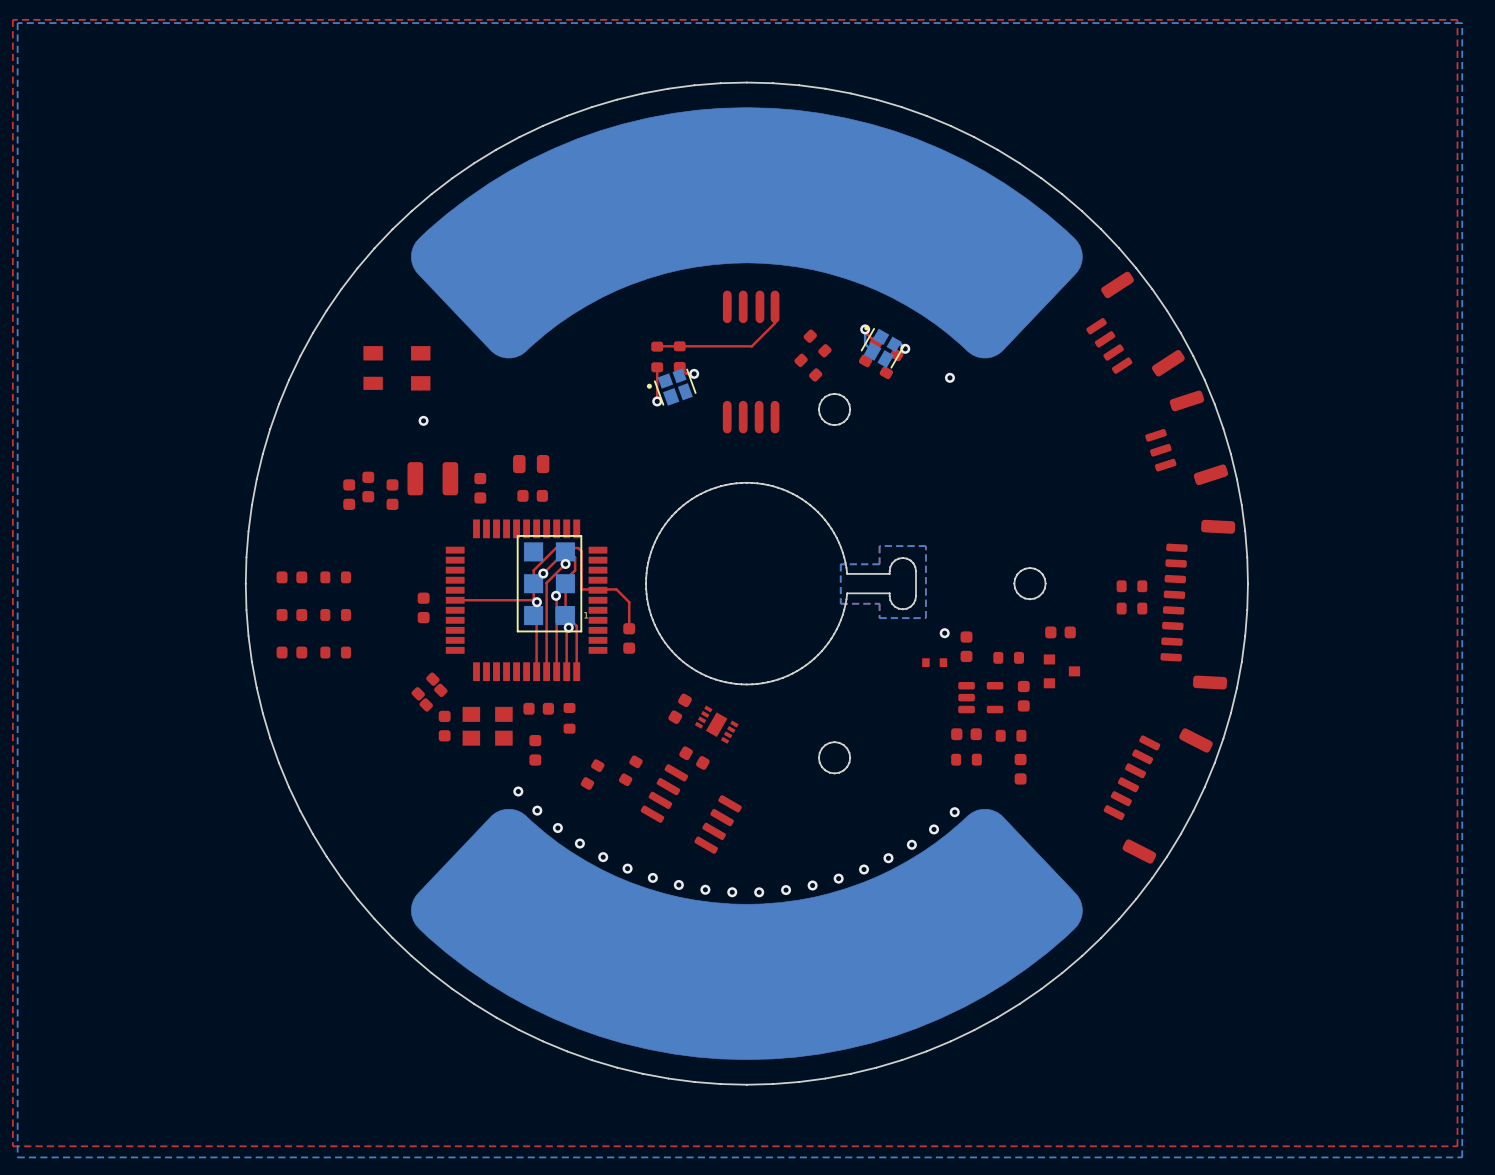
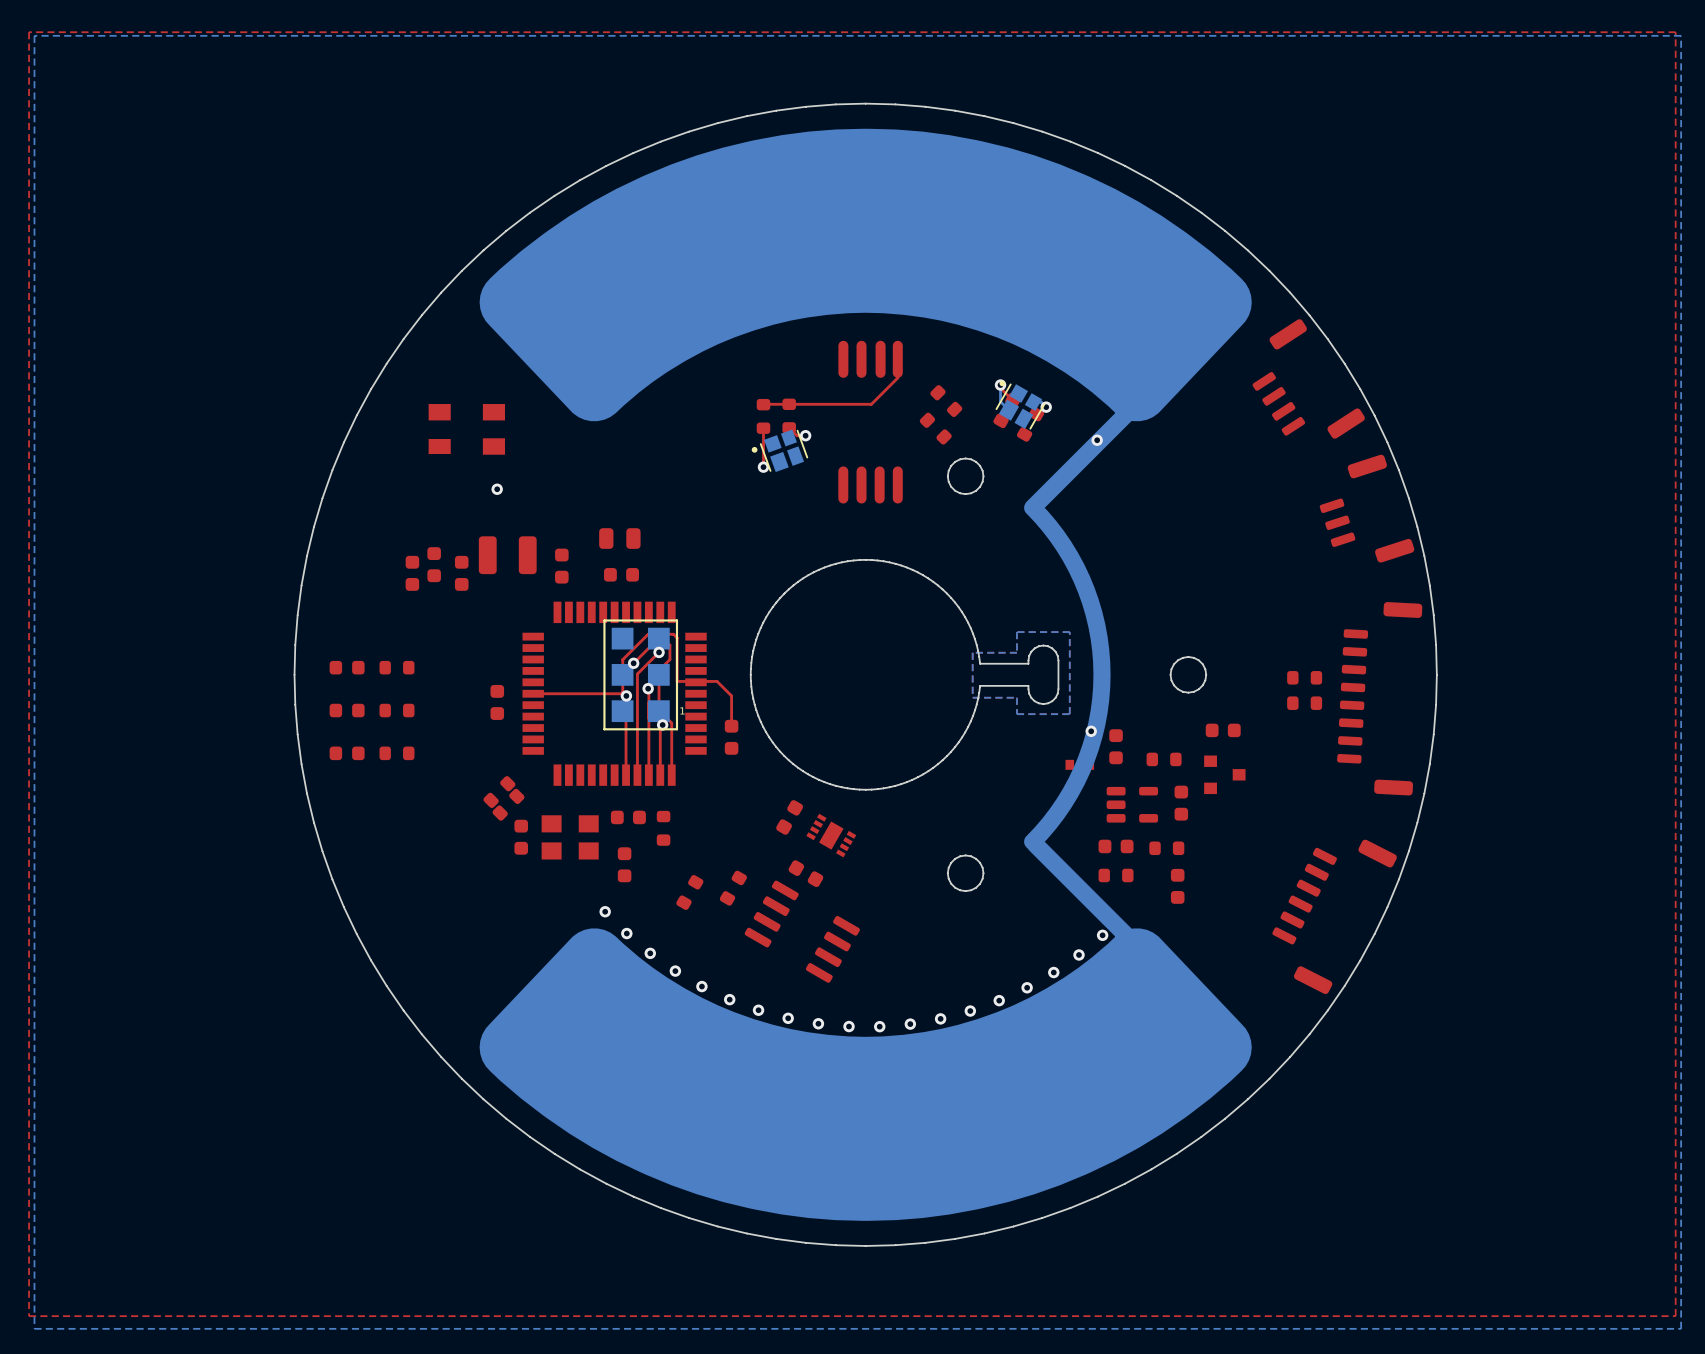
drawing: none -> [479, 128, 1252, 1221]
drawing: [410, 107, 1083, 359] -> none
drawing: [410, 808, 1083, 1060] -> none

